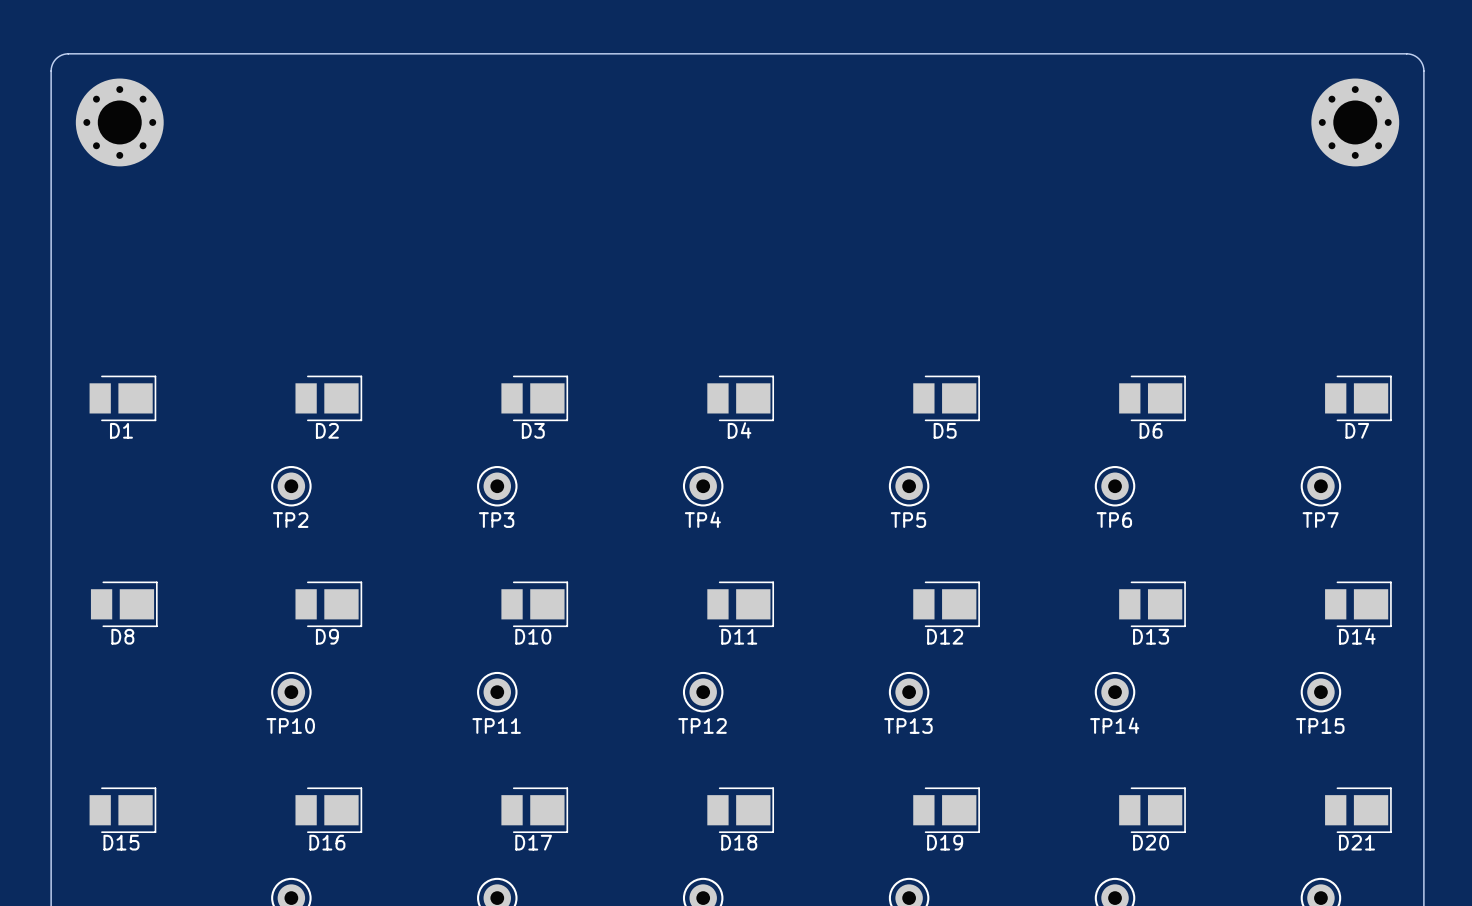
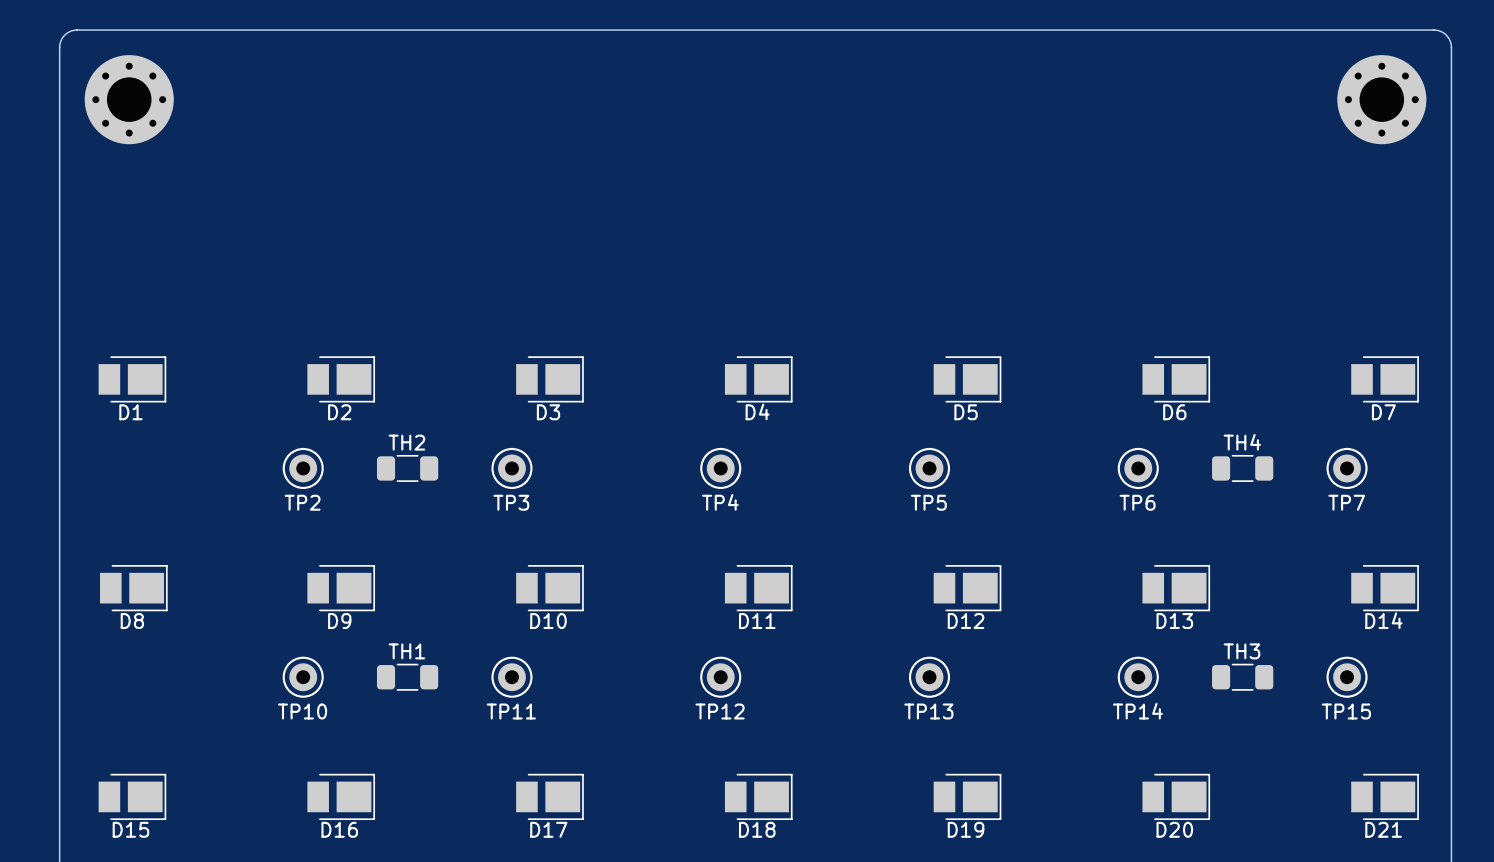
TH2: none -> (407, 468)
TH4: none -> (1242, 468)
TH1: none -> (407, 677)
TH3: none -> (1242, 677)

